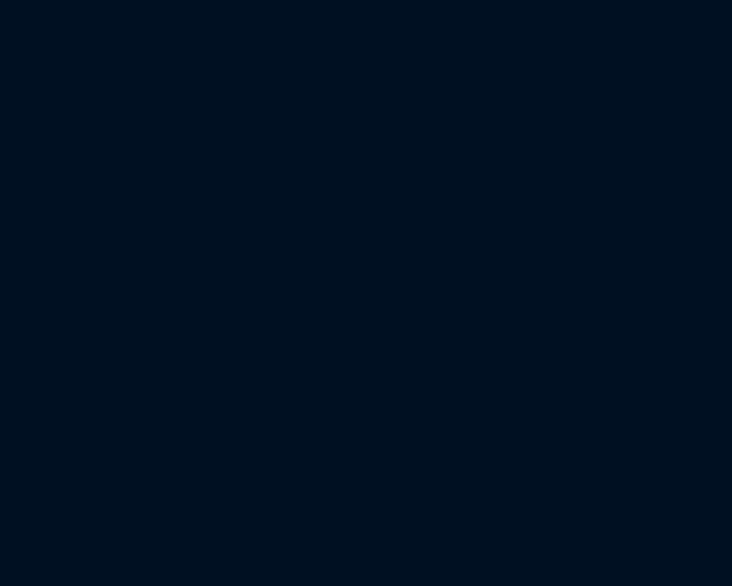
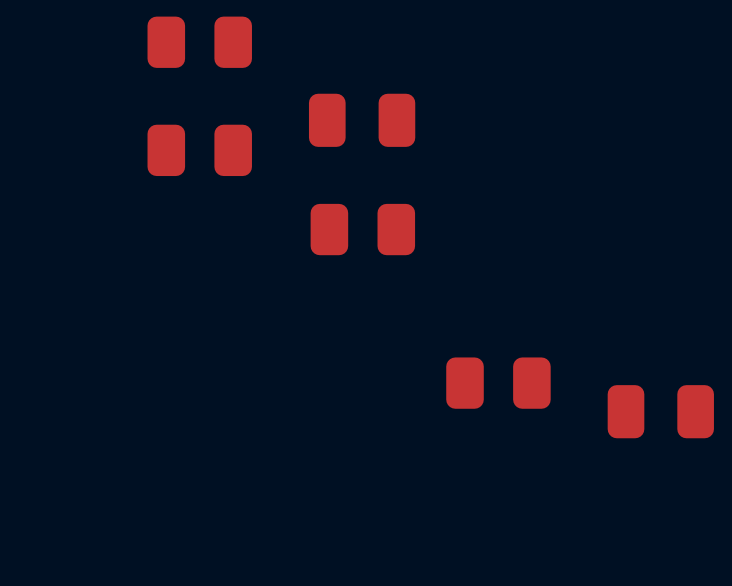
part: none -> (199, 42)
part: none -> (362, 120)
part: none -> (199, 150)
part: none -> (362, 229)
part: none -> (498, 383)
part: none -> (660, 411)

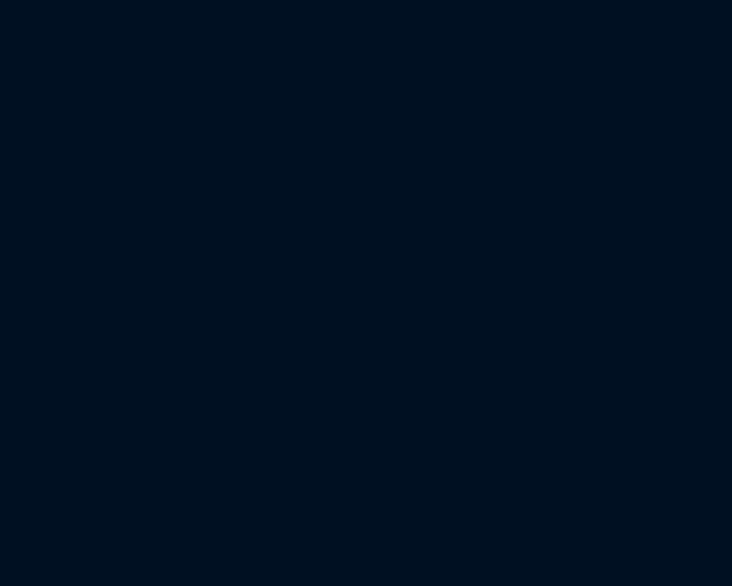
part: (199, 42) -> none
part: (362, 120) -> none
part: (199, 150) -> none
part: (362, 229) -> none
part: (498, 383) -> none
part: (660, 411) -> none

